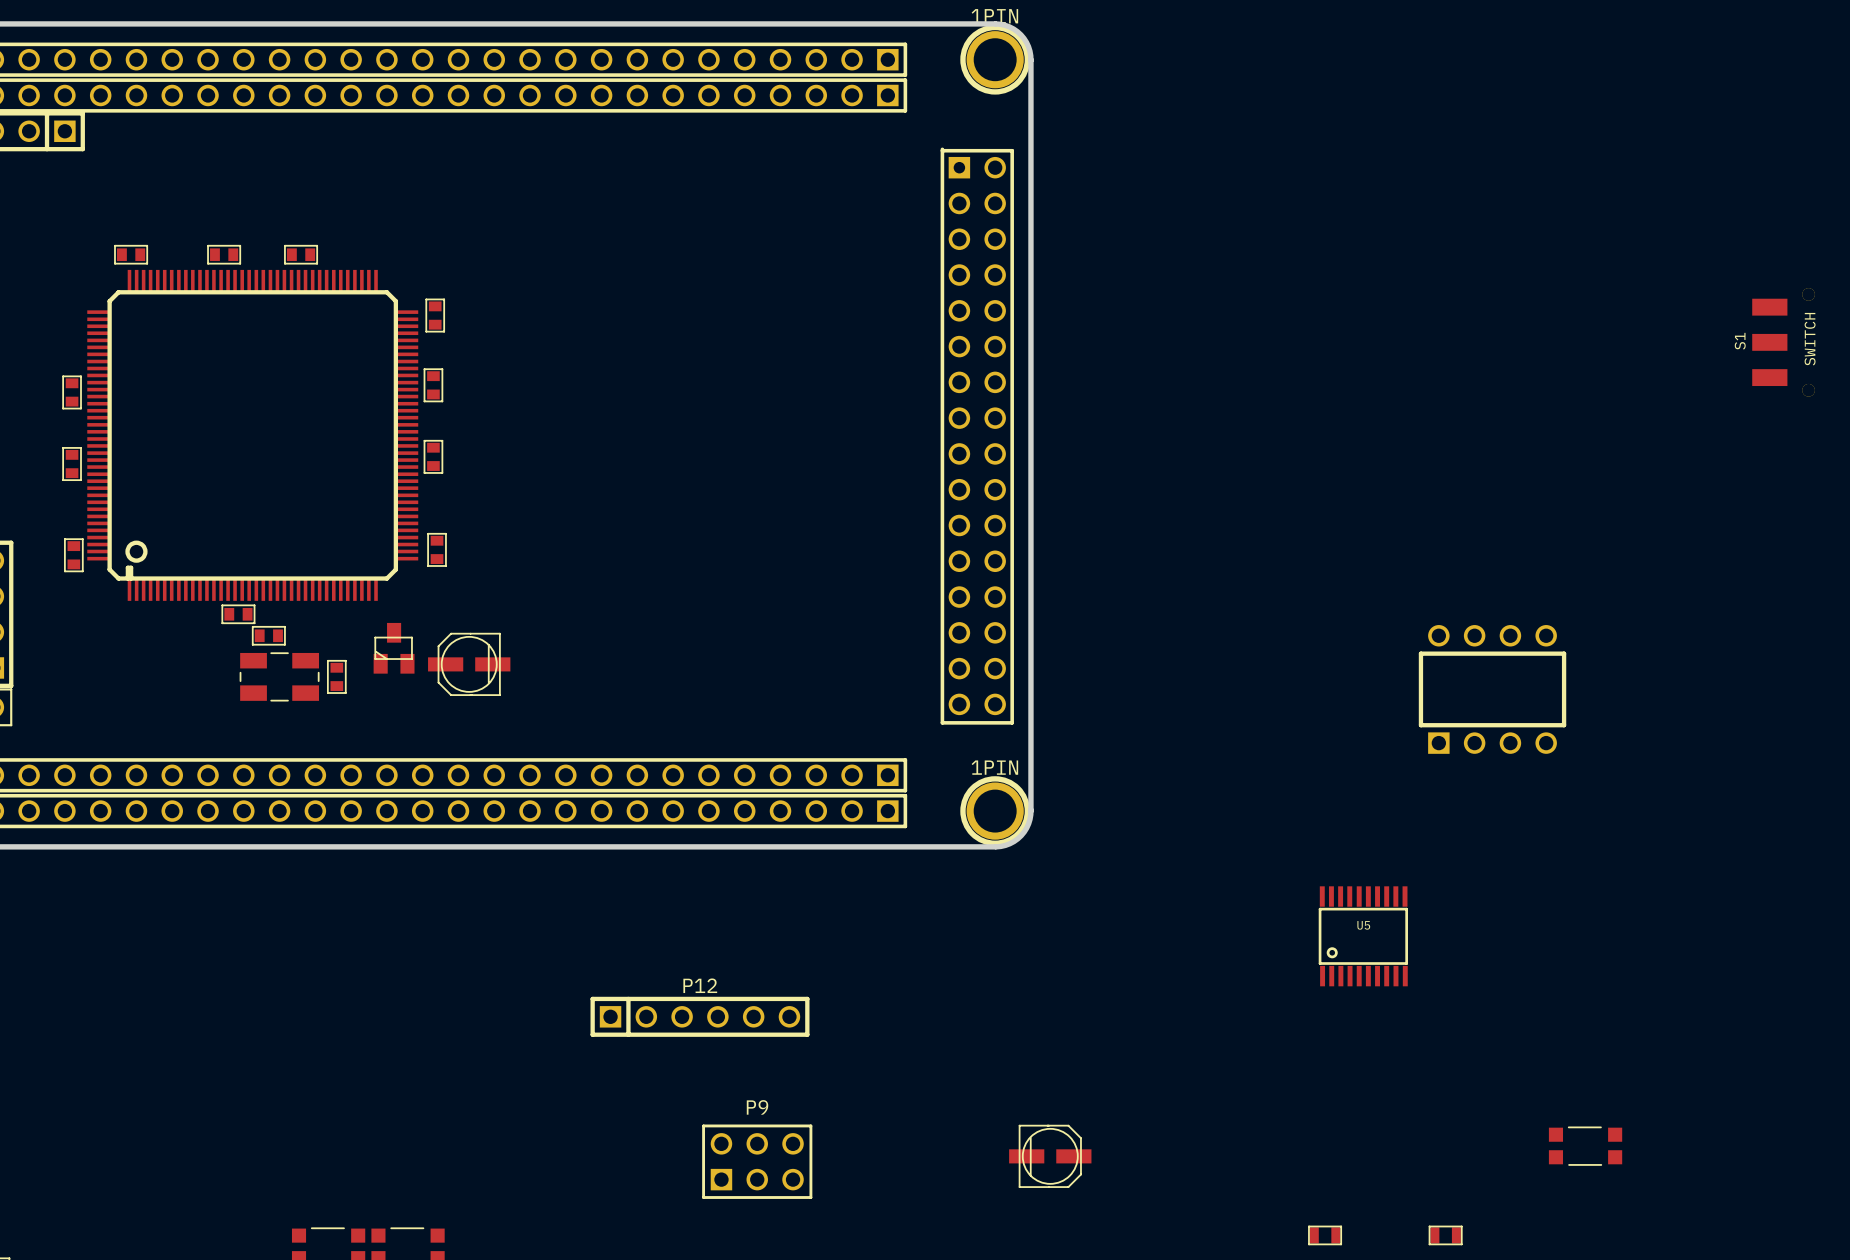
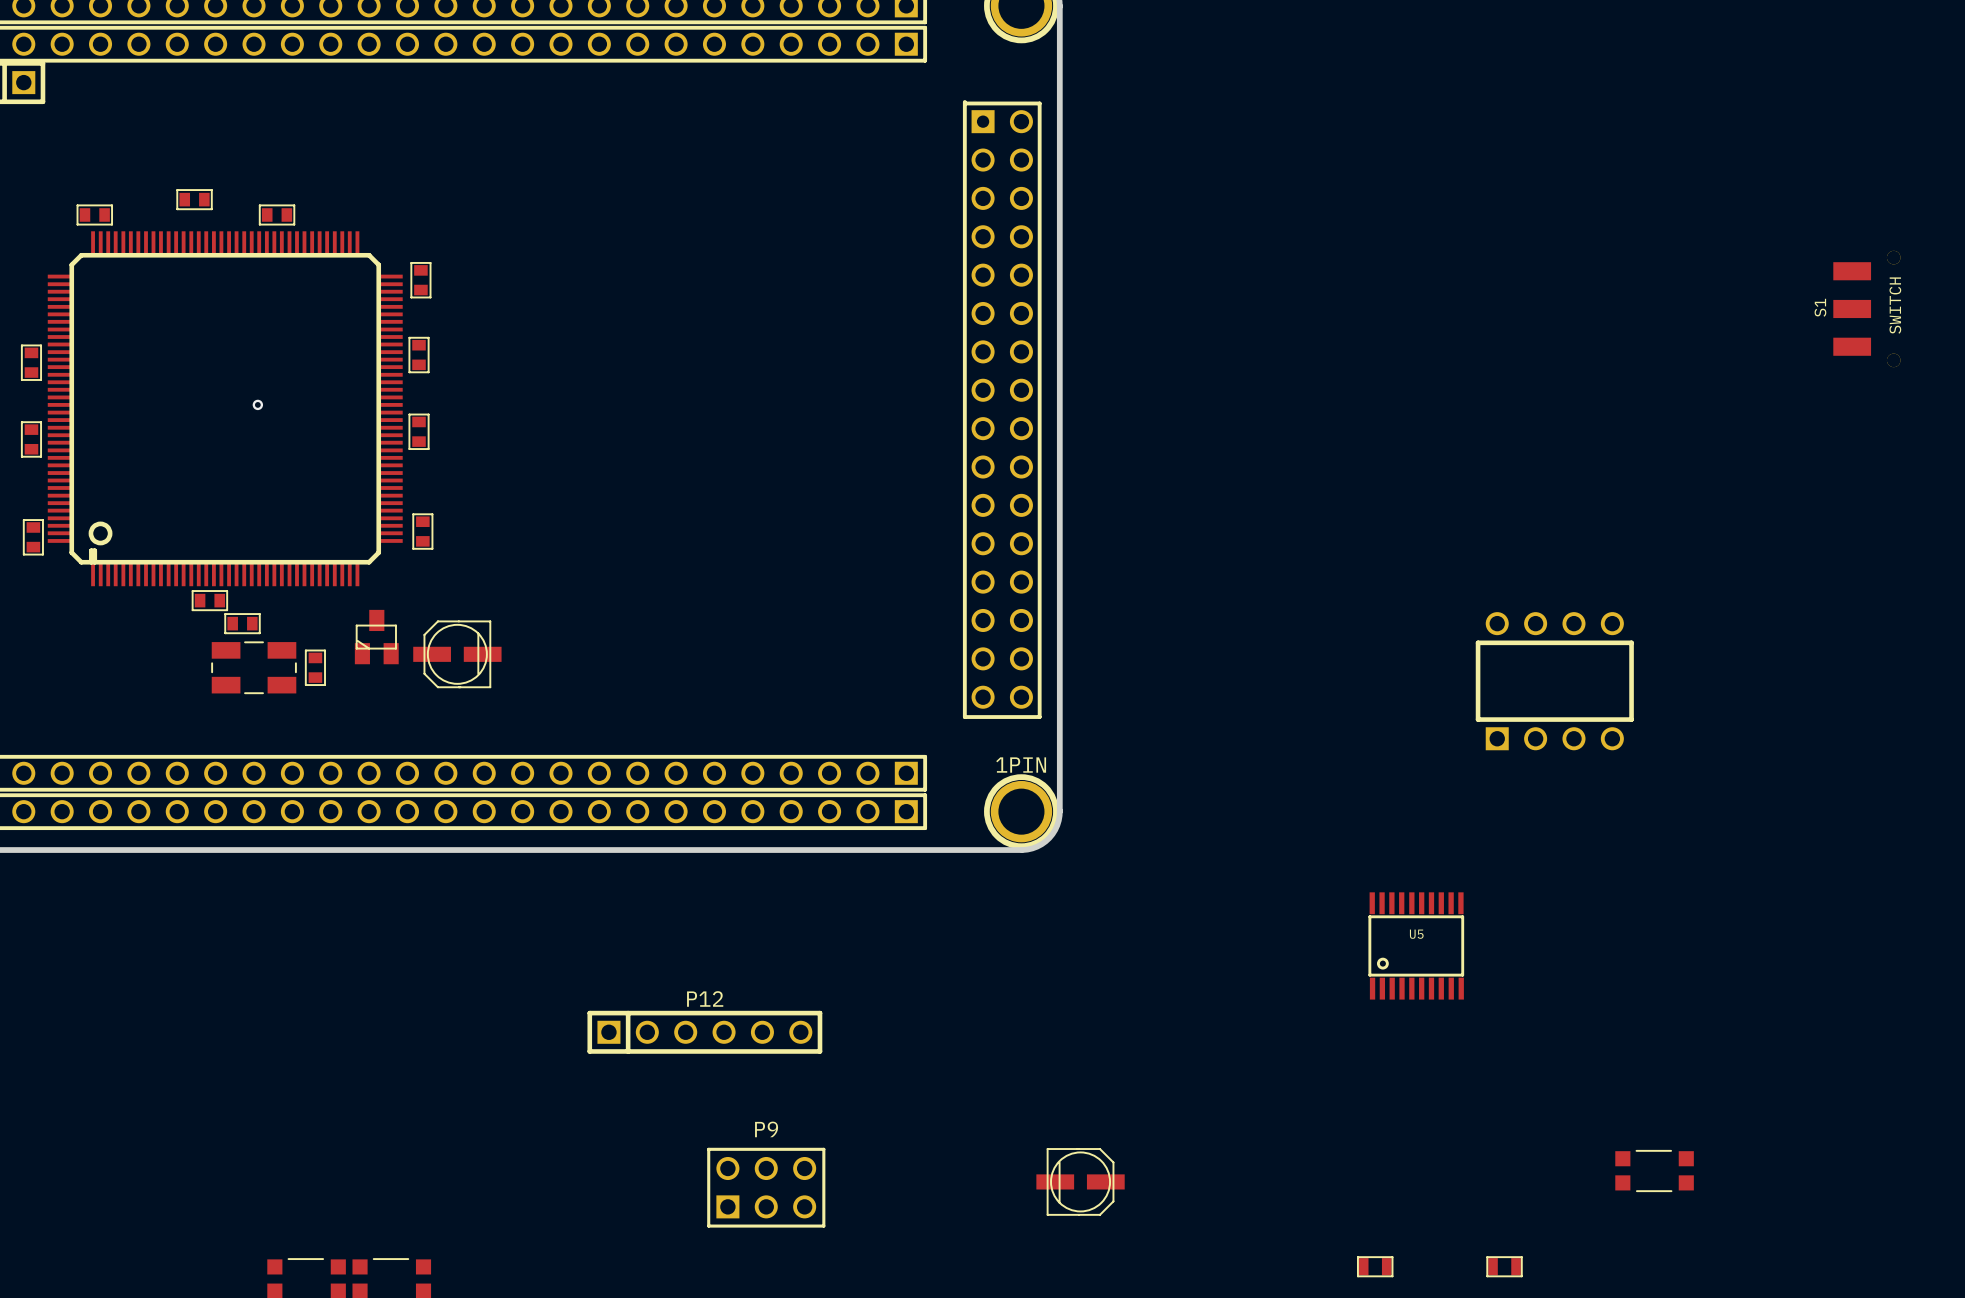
part position: (224, 254) -> (194, 199)
via: none -> (257, 404)

